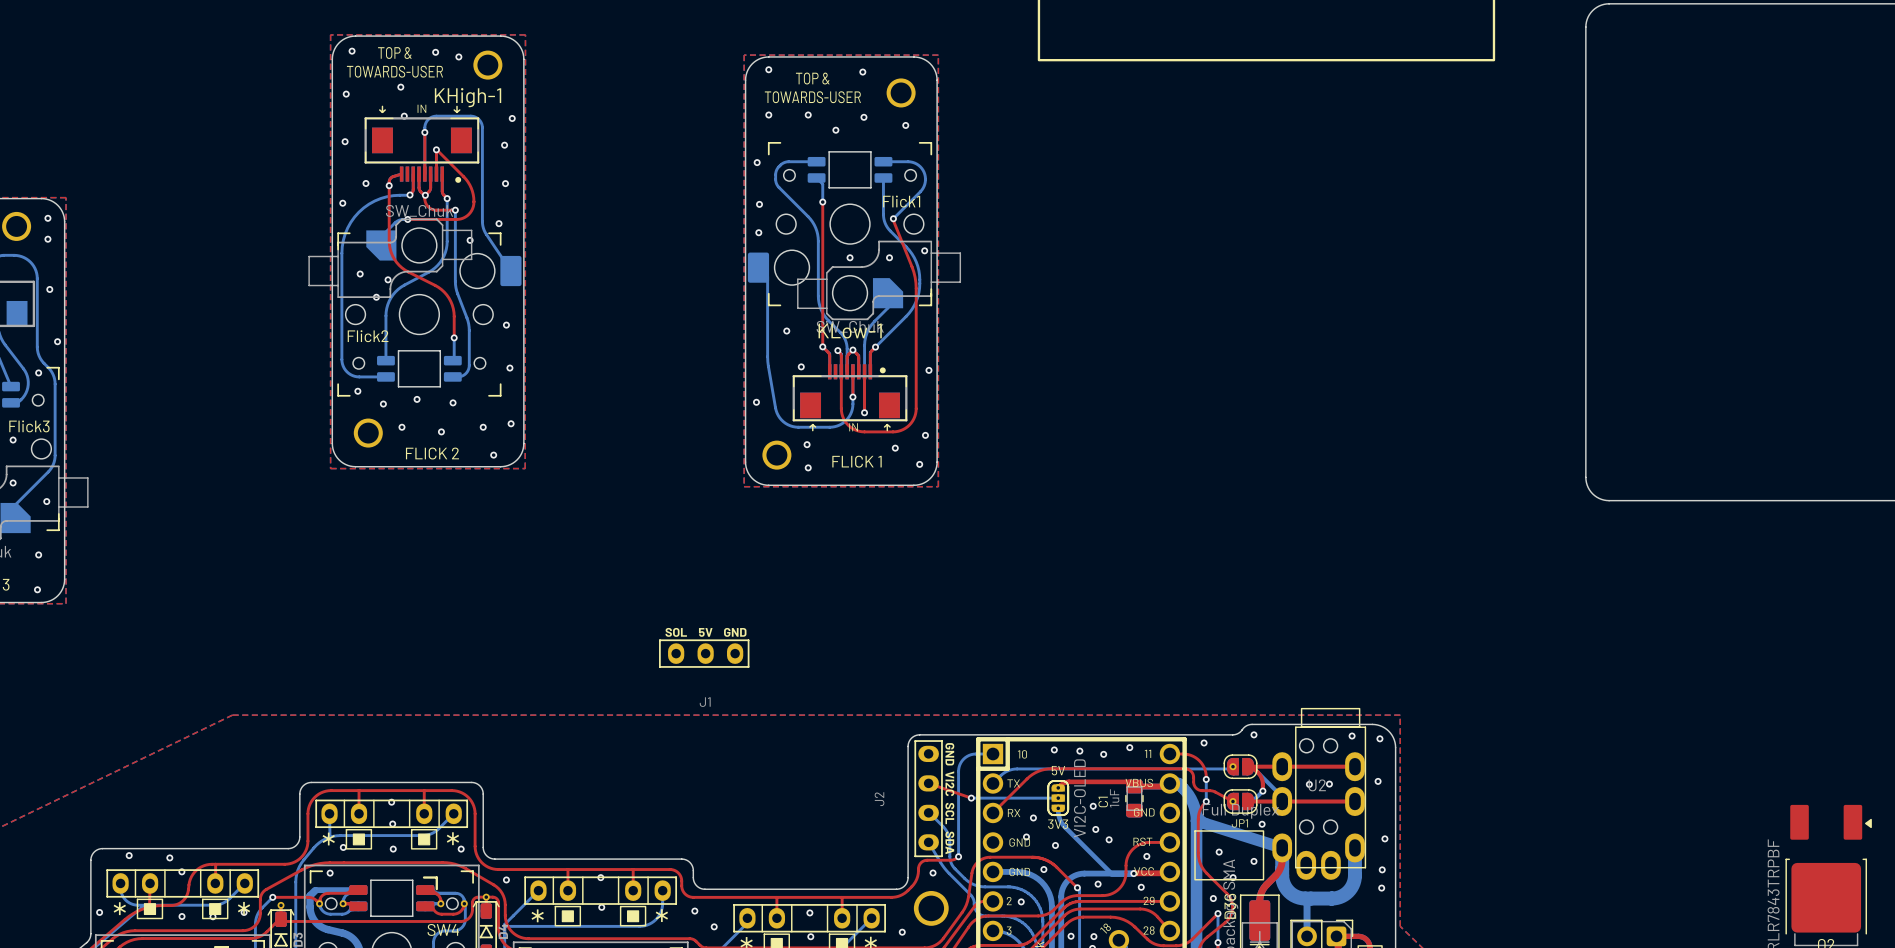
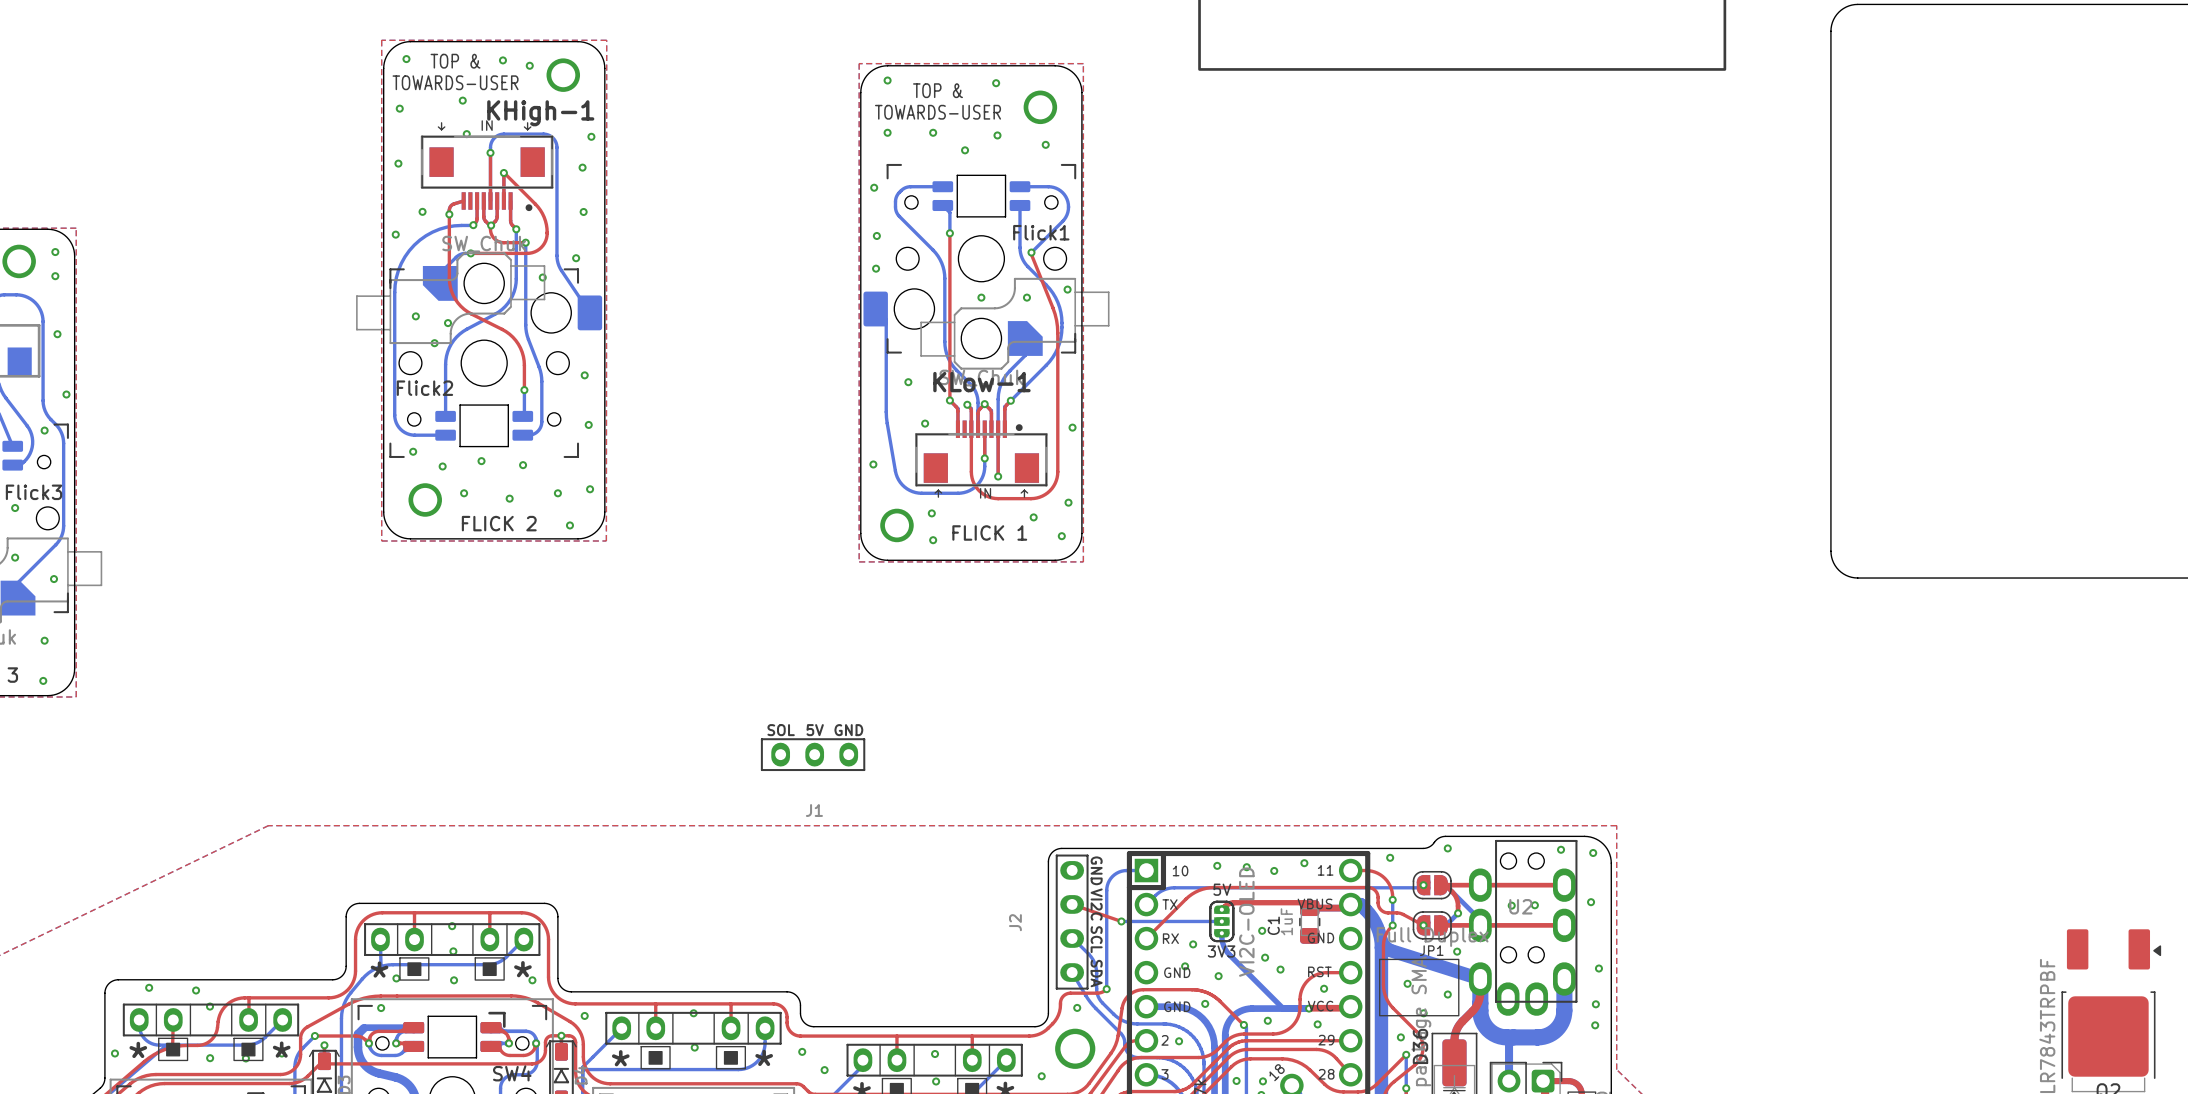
U2 footprint: [1272, 708, 1367, 880] -> [1468, 839, 1578, 1016]

